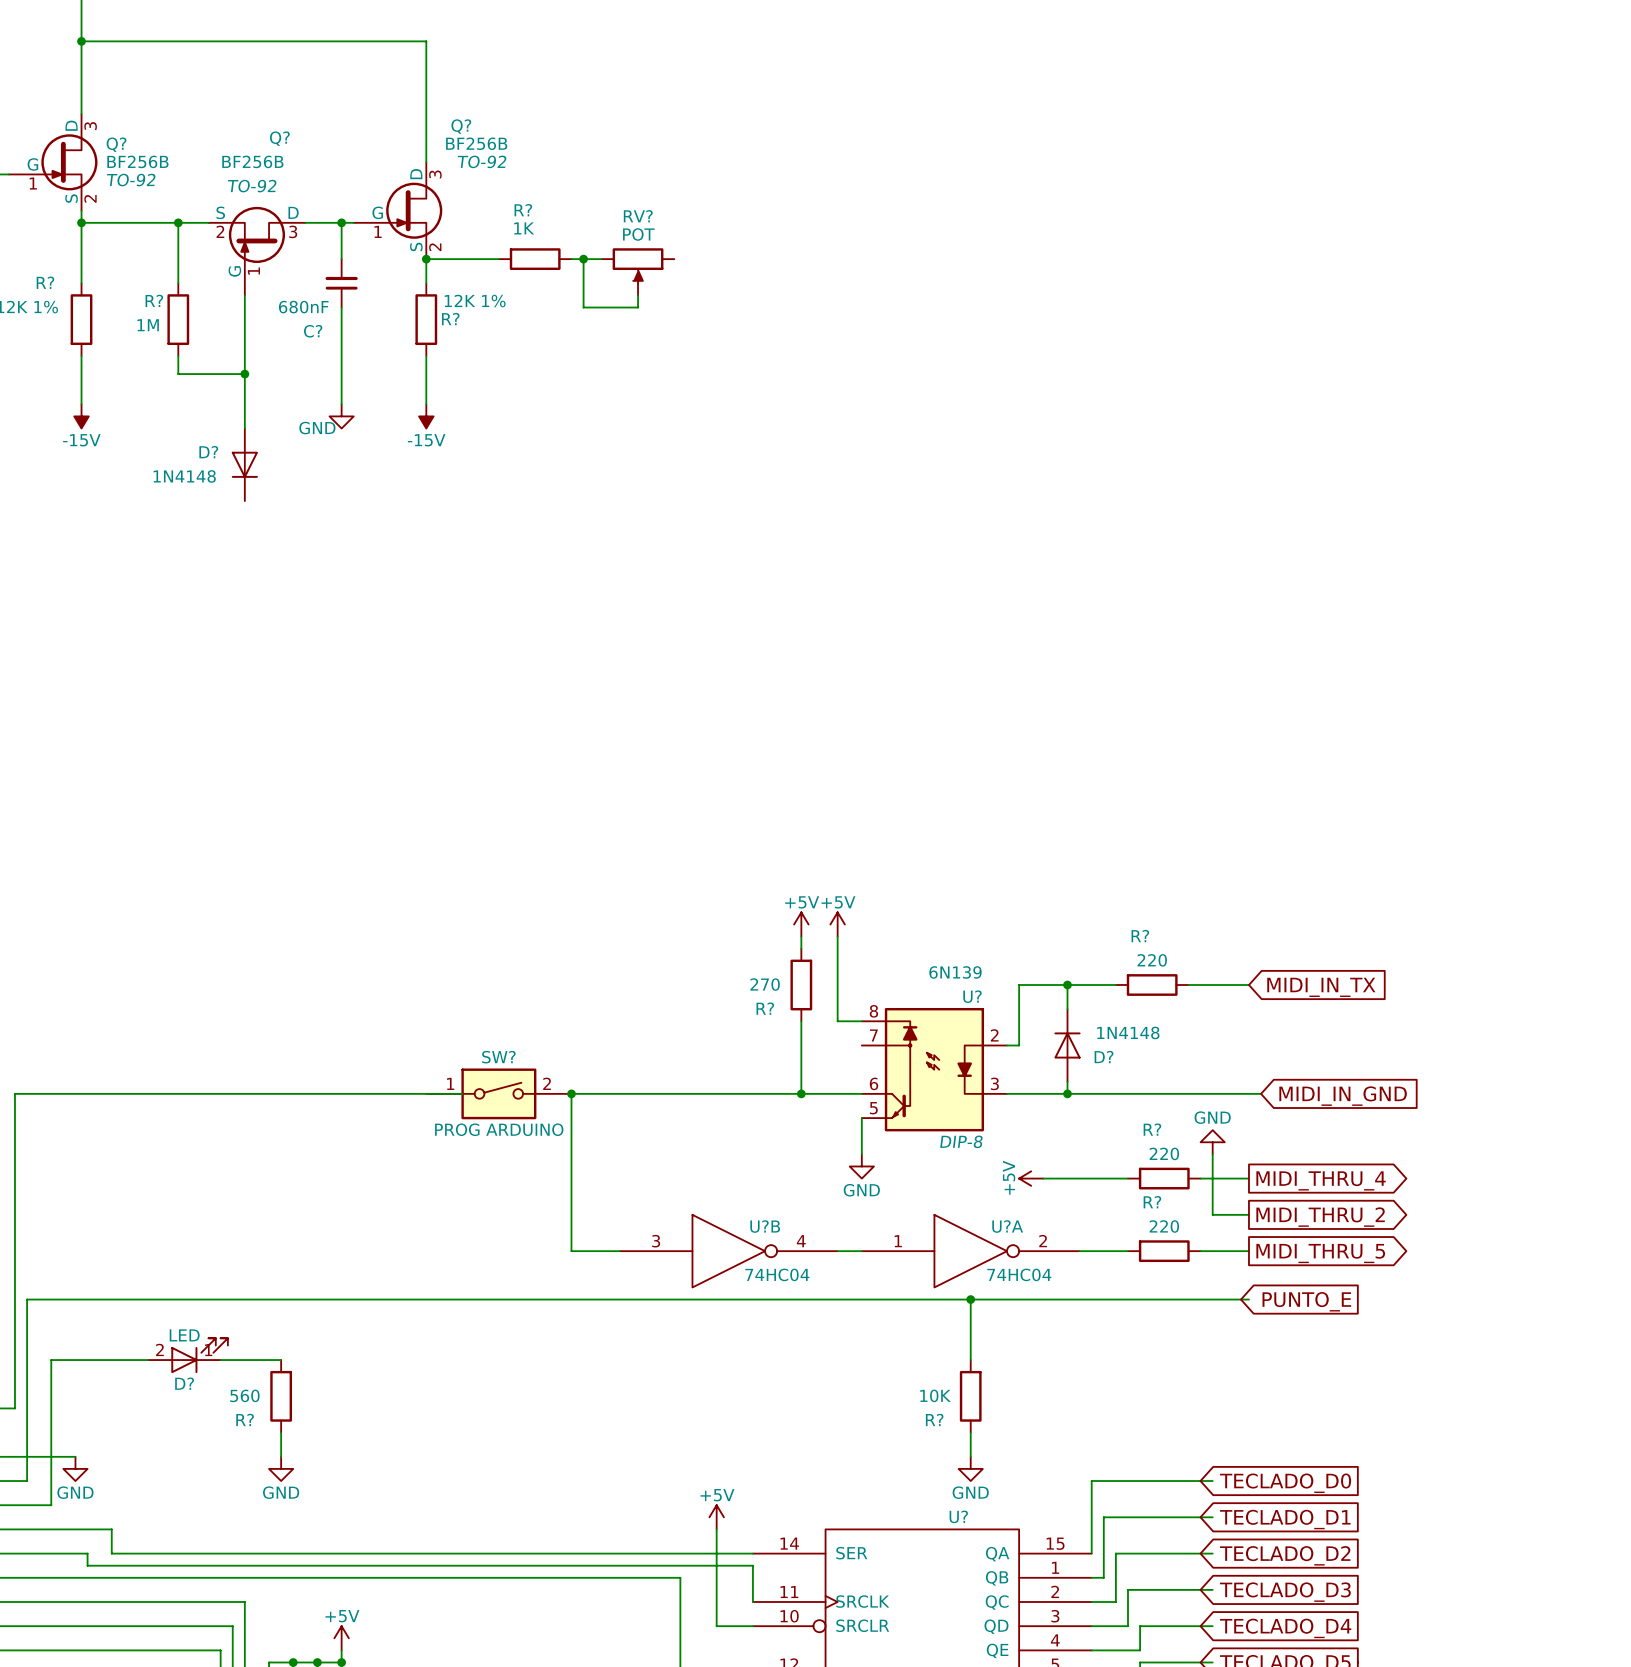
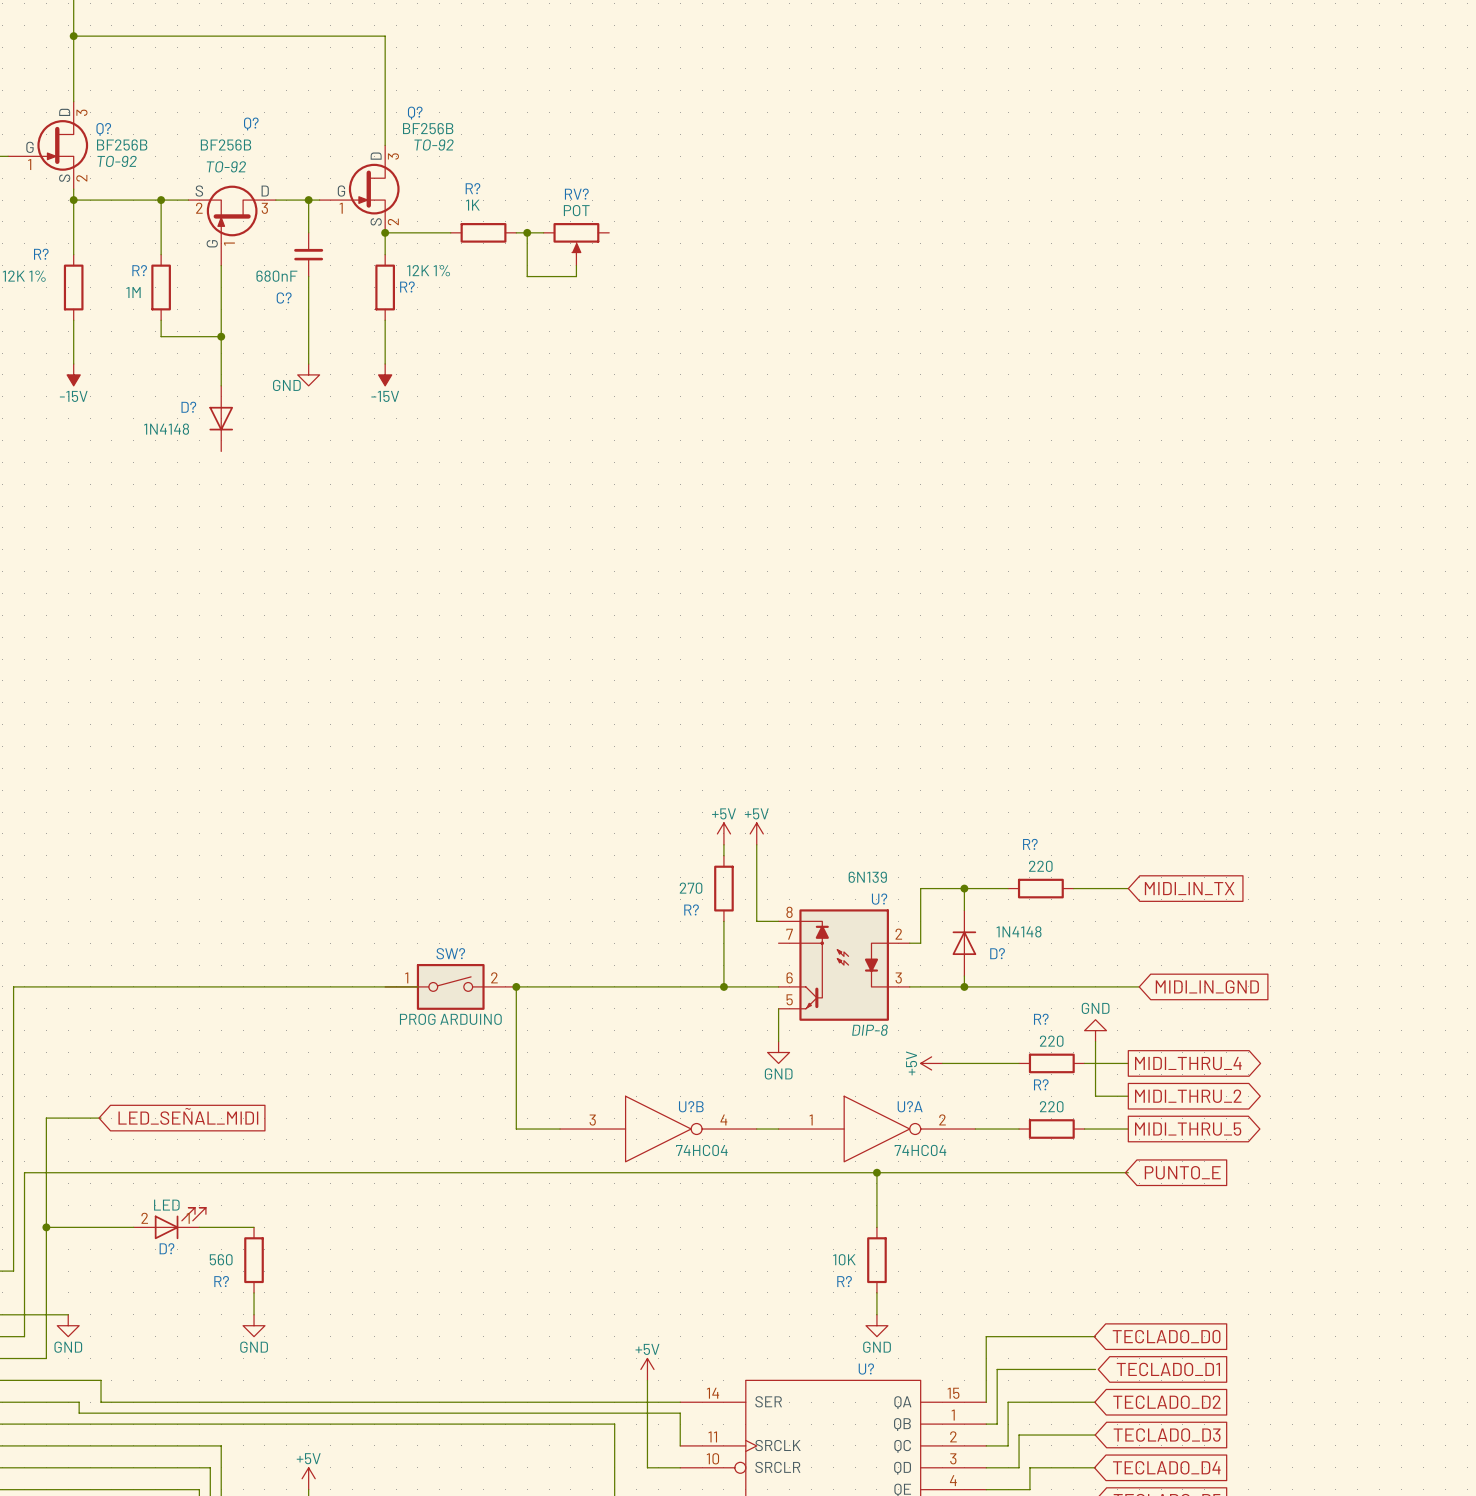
wire: none -> (101, 1118) (46, 1118) (46, 1227)
global label: none -> LED_SEÑAL_MIDI (188, 1116)
junction: none -> (46, 1227)

